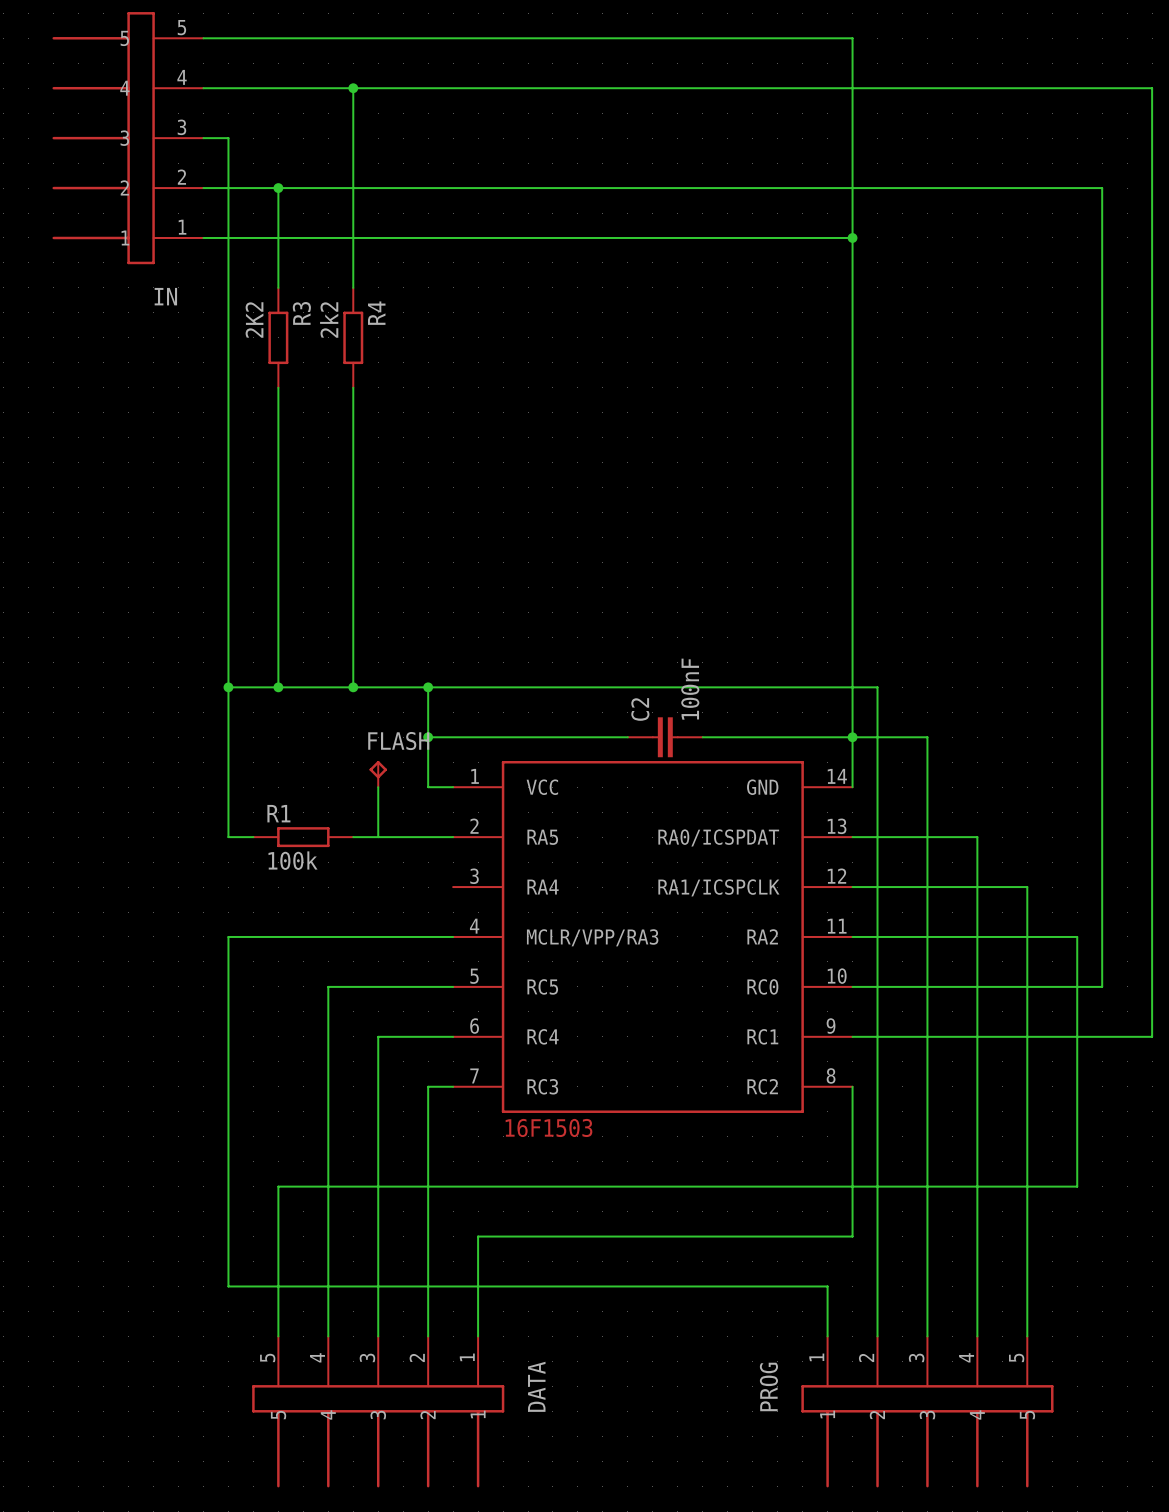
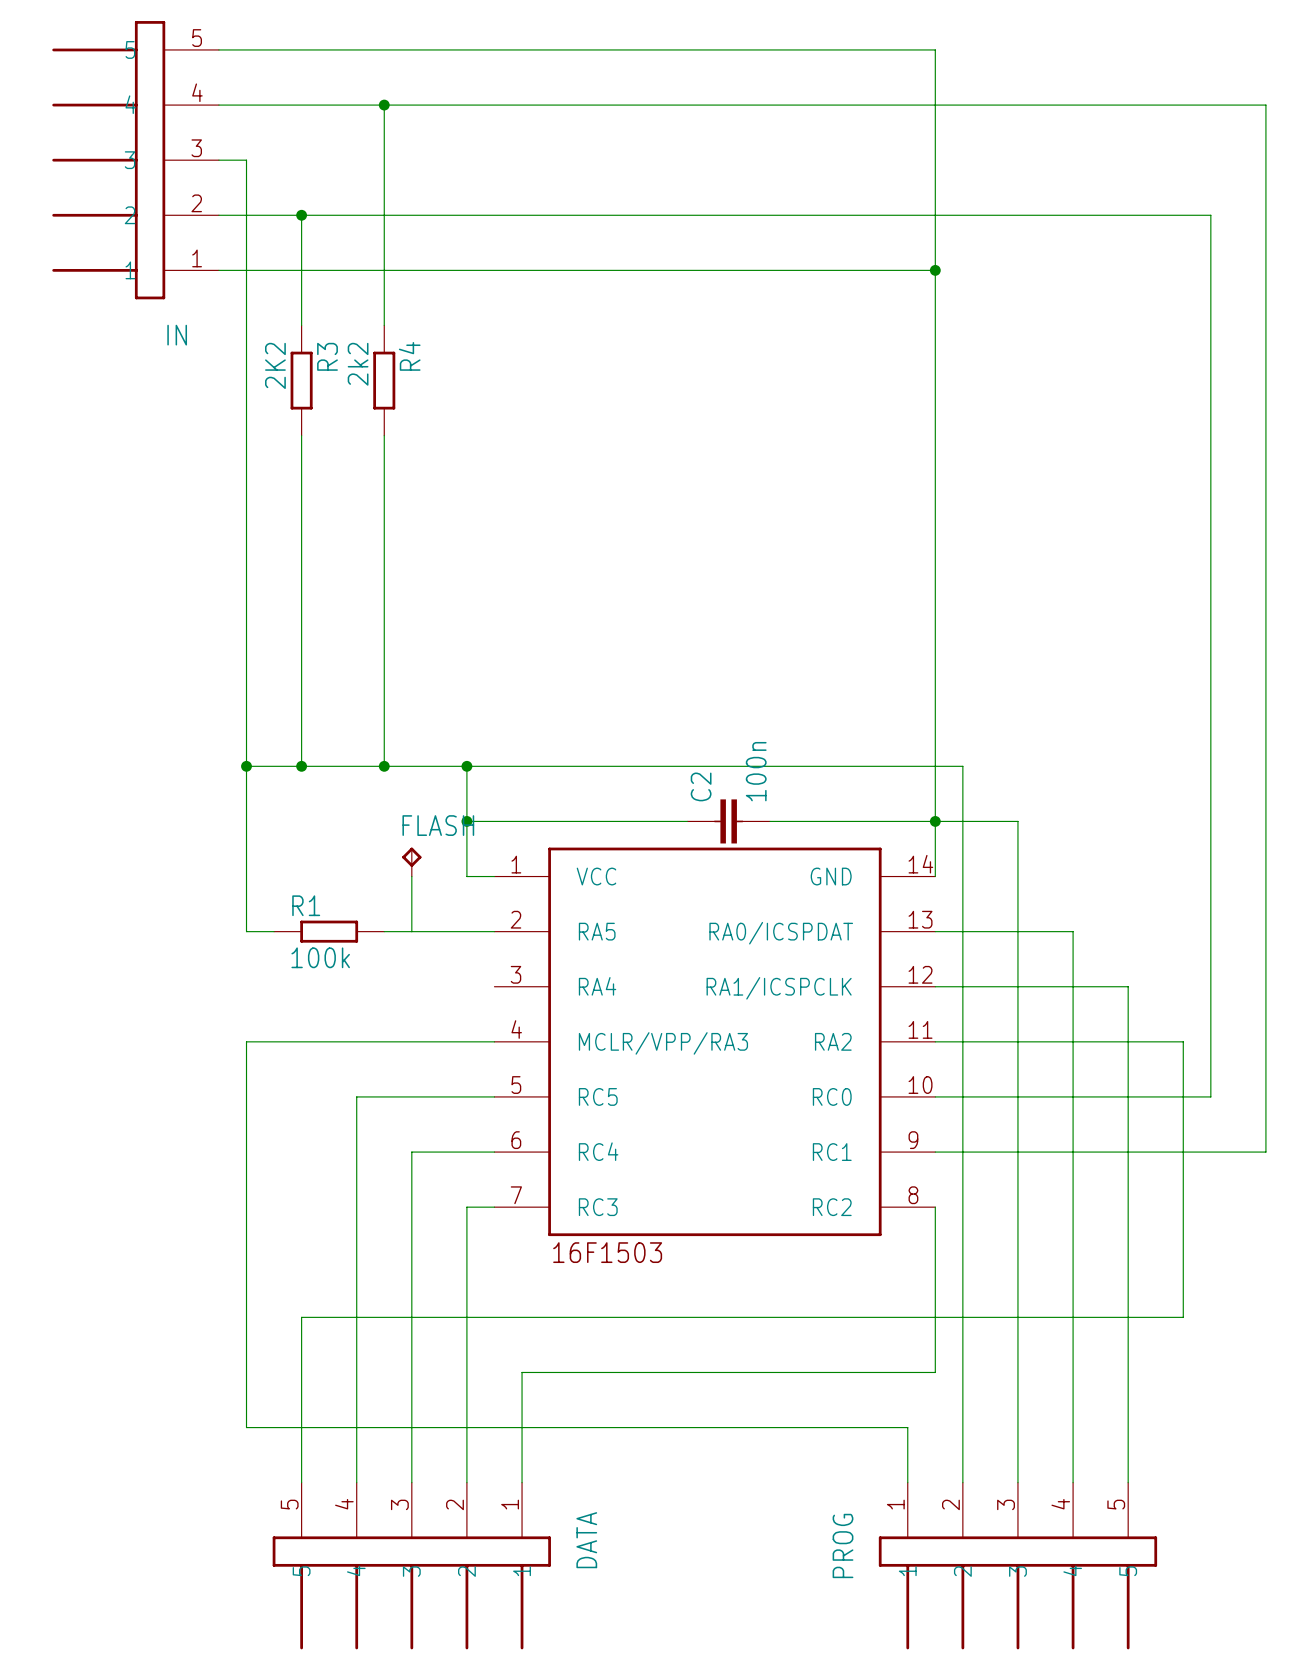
C2 value: 100nF (690, 689) -> 100n (756, 771)

